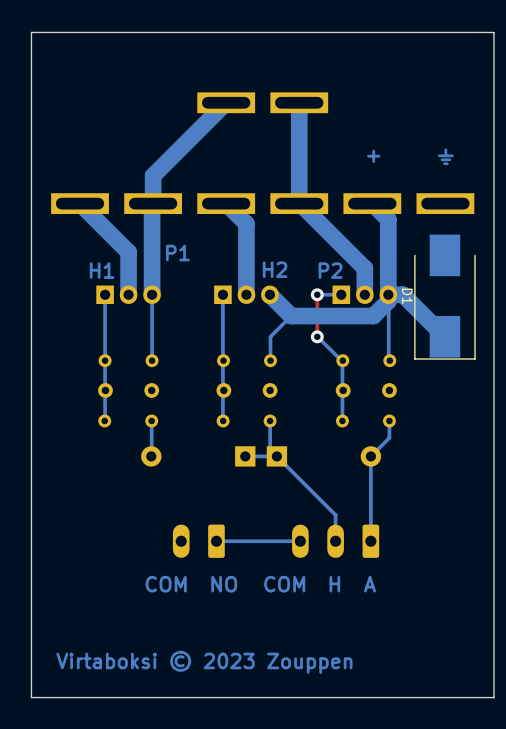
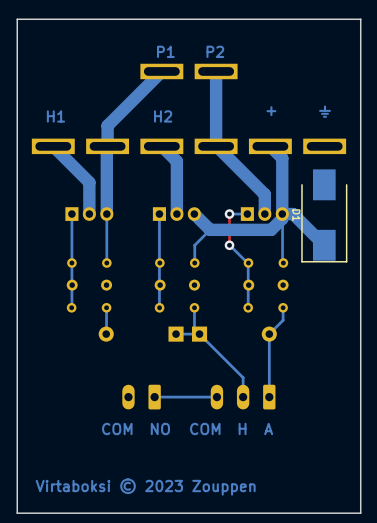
text position: P1 (177, 253) -> P1 (165, 51)
text position: H2 (275, 269) -> H2 (163, 116)
text position: H1 (102, 270) -> H1 (55, 116)
text position: P2 (330, 270) -> P2 (215, 51)

